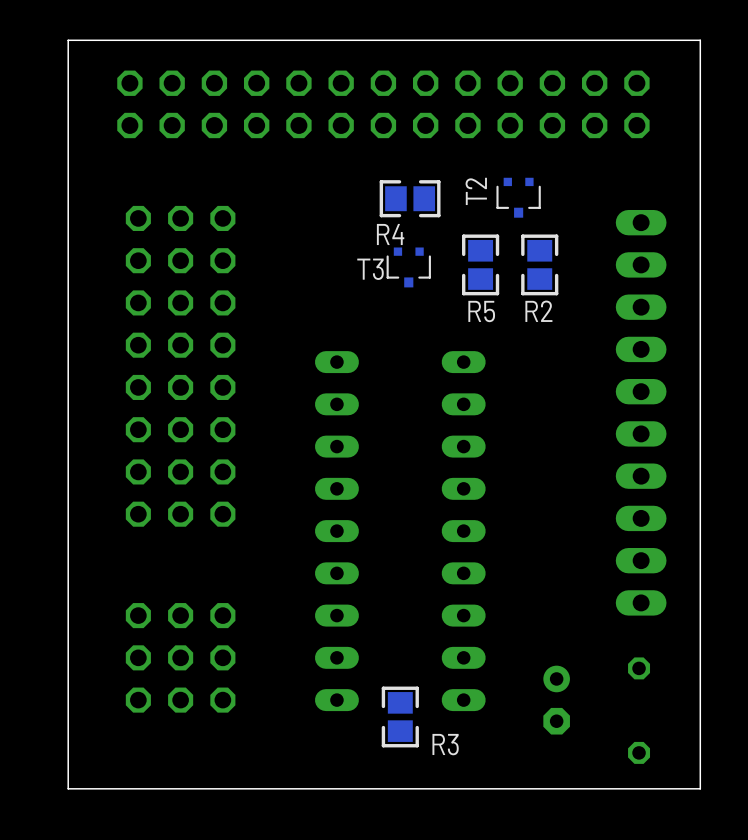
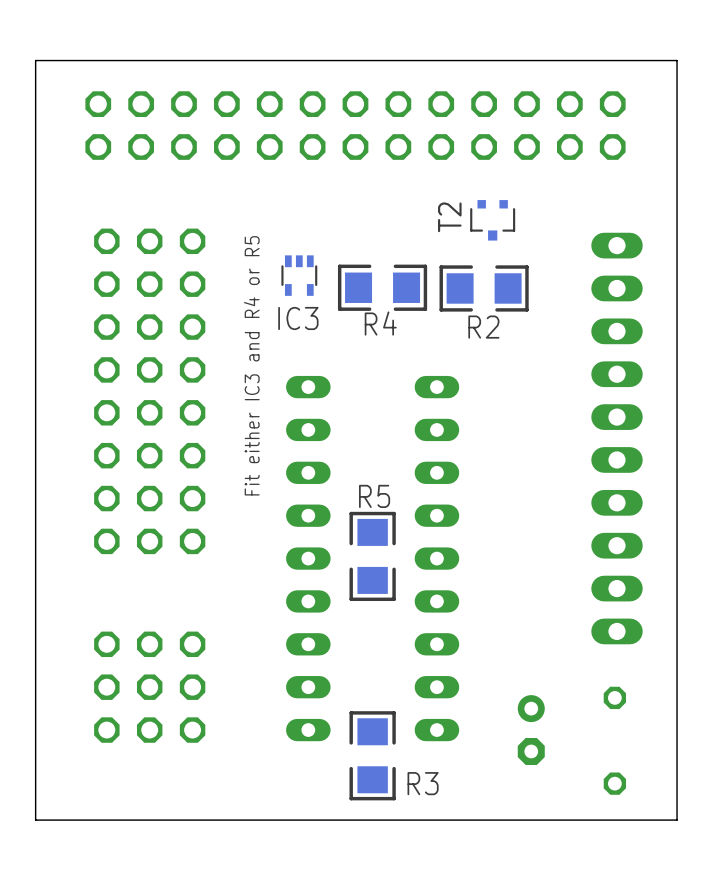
R4 footprint: [379, 180, 441, 218] -> [337, 264, 428, 311]
R5 footprint: [462, 234, 500, 296] -> [349, 511, 396, 602]
R2 footprint: [521, 234, 559, 296] -> [439, 265, 529, 312]
IC3: none -> (299, 275)
T3: (408, 267) -> none
R5 name position: R5 (481, 311) -> R5 (374, 496)
text: none -> Fit either IC3 and R4 or R5 (251, 365)
R3 footprint: [381, 686, 419, 748] -> [349, 711, 396, 801]

